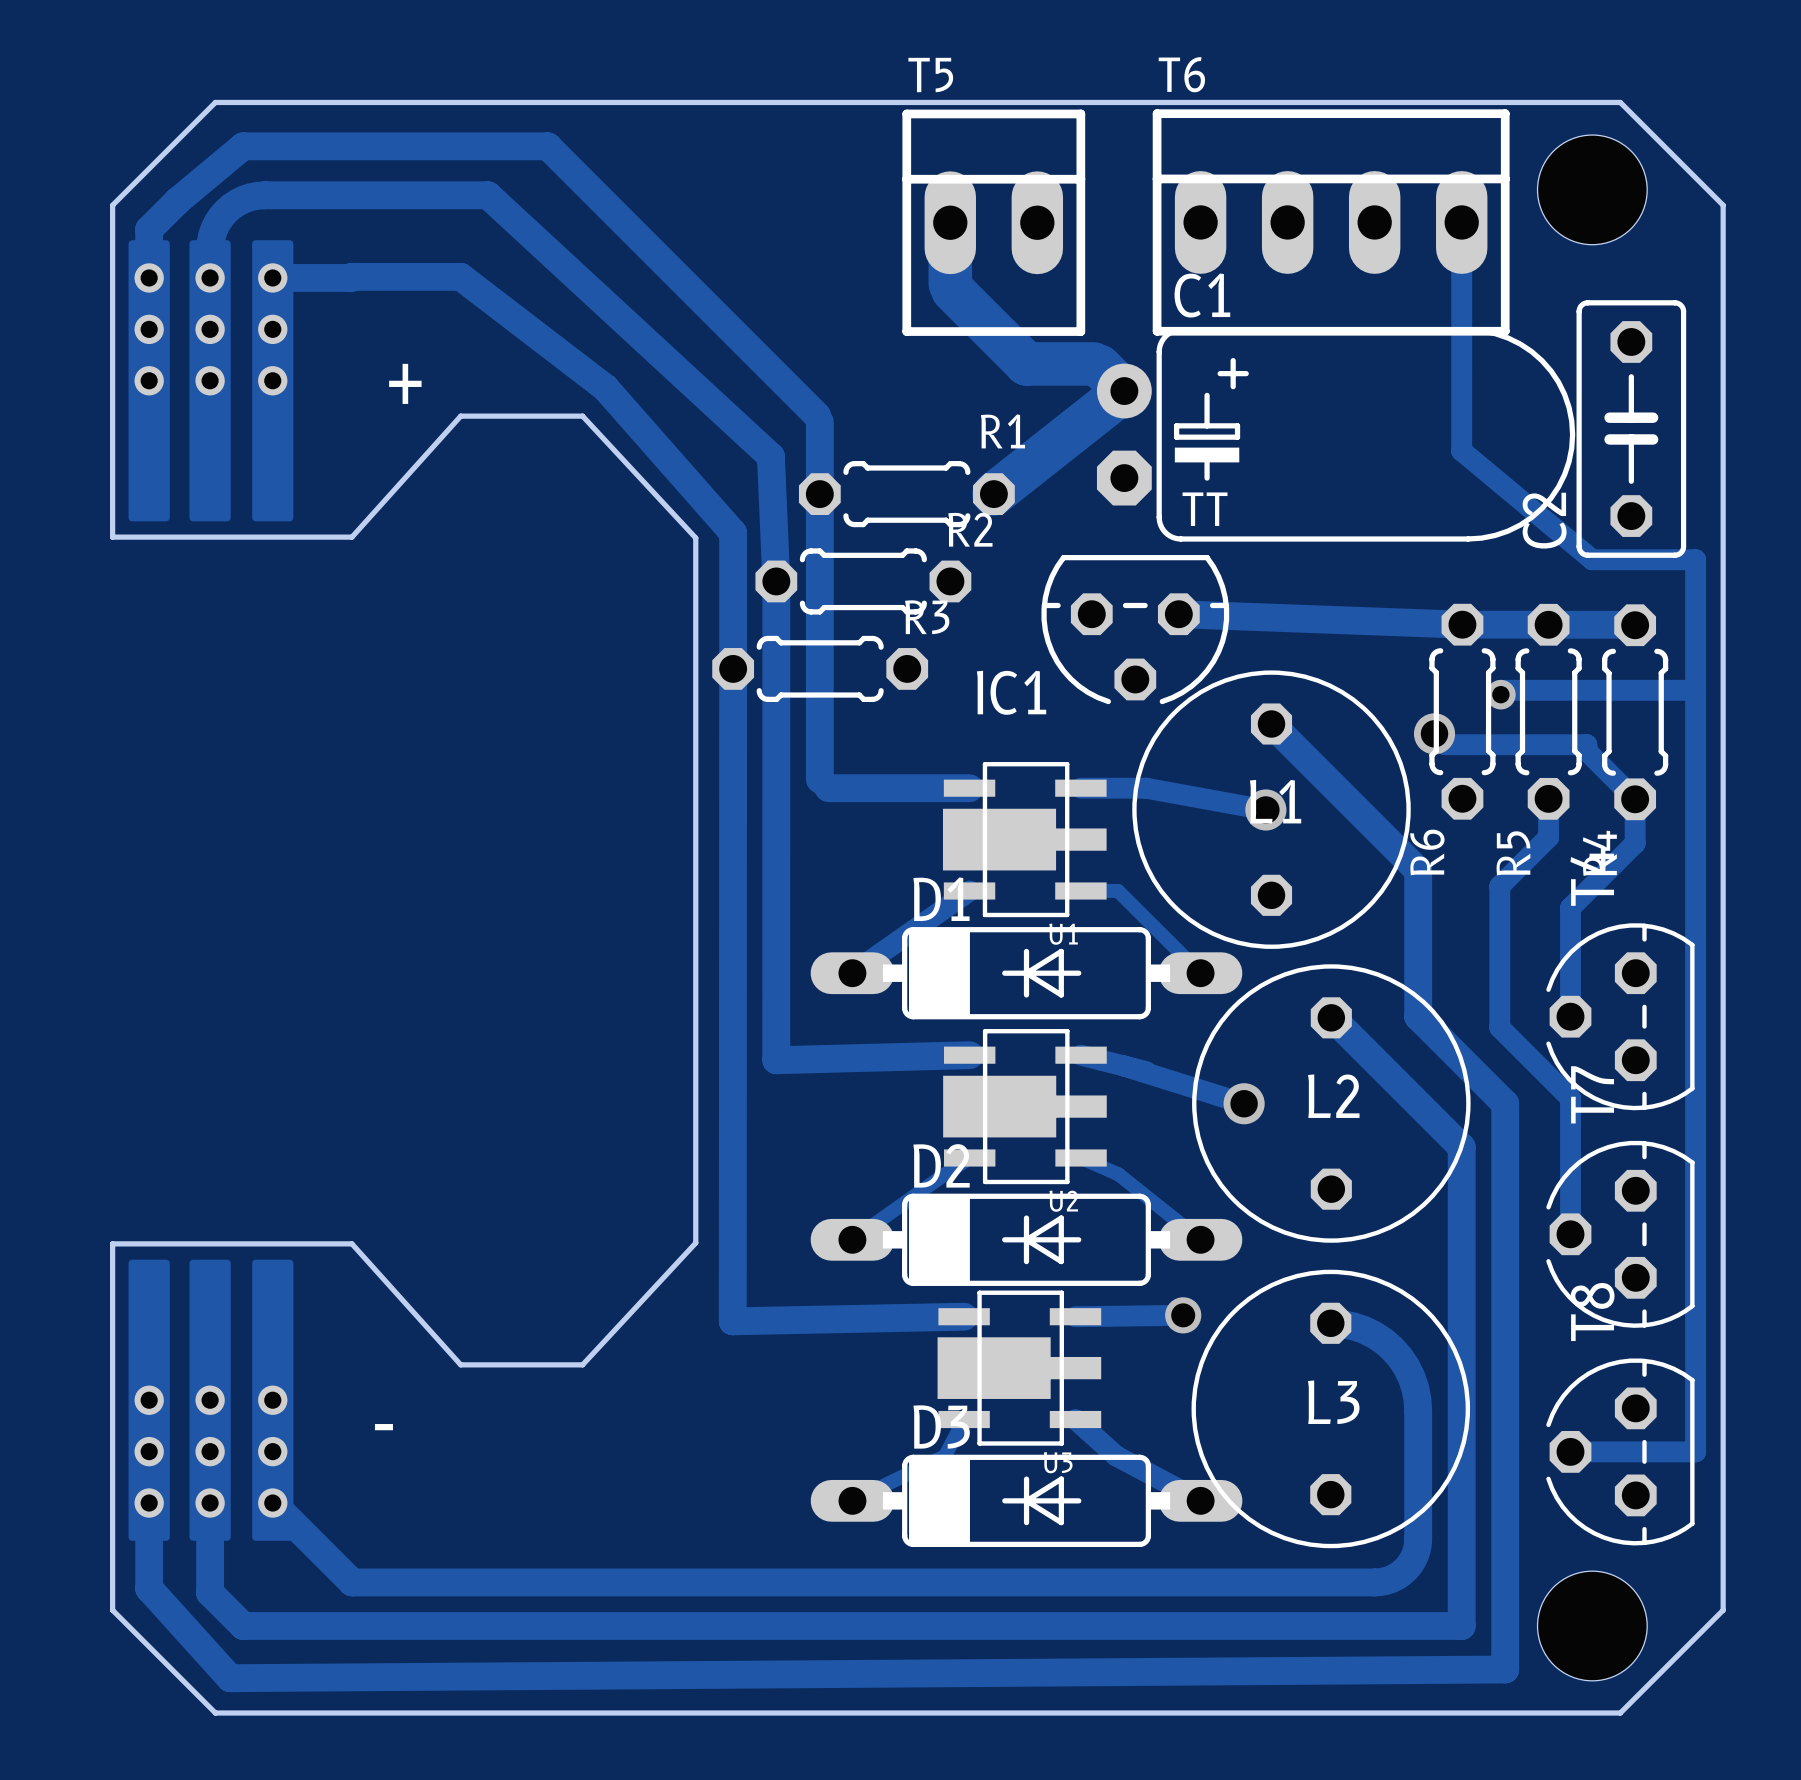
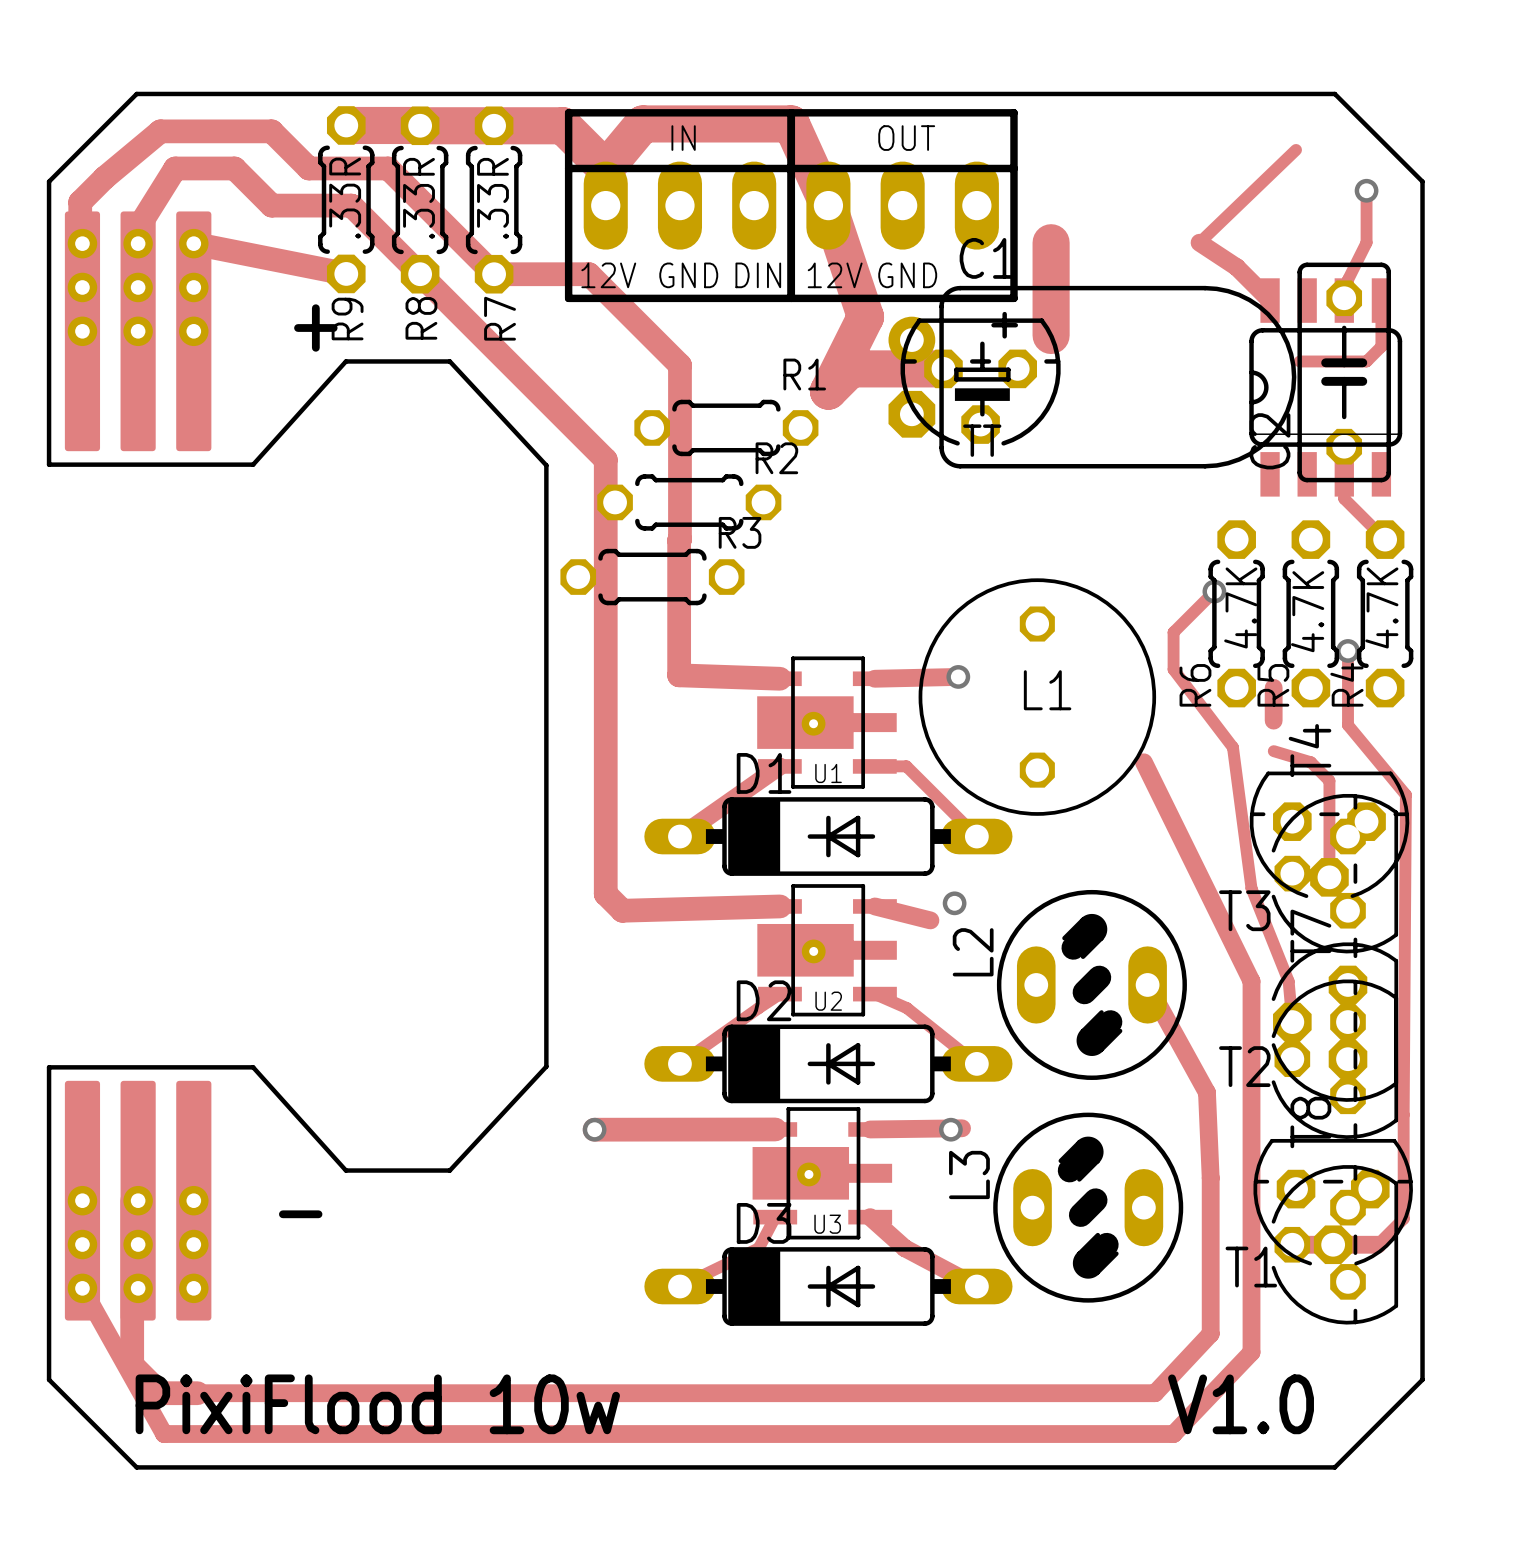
track: none -> (346, 125) (419, 125)
track: none -> (420, 125) (563, 125) (605, 168)
track: (373, 146) (547, 146) (817, 415) (819, 421) (820, 782) (828, 788) (969, 788) -> (271, 131) (308, 168) (388, 168) (494, 274) (589, 274) (679, 365) (679, 675) (779, 678)
text: none -> IN (683, 138)
text: none -> OUT (906, 138)
track: none -> (1296, 149) (1199, 242) (1236, 267) (1270, 300)
track: none -> (605, 168) (642, 123) (791, 123) (828, 205) (865, 316) (828, 391) (850, 368) (943, 368)
track: none -> (1366, 190) (1366, 242) (1348, 279) (1348, 296) (1344, 300)
via: none -> (1366, 190)
track: (950, 222) (951, 288) (1026, 363) (1095, 364) (1124, 391) (993, 494) -> none
T5: (993, 222) -> none
T6: (1331, 222) -> none
track: (1461, 222) (1461, 450) (1592, 559) (1695, 559) (1695, 1451) (1670, 1451) -> (1348, 650) (1348, 725) (1405, 794) (1403, 1218) (1377, 1244)
R9: none -> .33R (346, 199)
R8: none -> .33R (420, 199)
R7: none -> .33R (494, 200)
part: none -> (679, 205)
part: none -> (902, 205)
track: none -> (1051, 242) (1051, 335)
track: none -> (346, 273) (193, 243) (193, 331)
text: none -> 12V (608, 275)
text: none -> GND (688, 275)
text: none -> DIN (758, 275)
text: none -> 12V (835, 275)
text: none -> GND (907, 275)
track: none -> (1381, 300) (1381, 346) (1366, 361) (1299, 361)
text: none -> + (315, 328)
part: none -> (82, 331)
track: (210, 380) (210, 242) (217, 222) (226, 211) (237, 202) (250, 197) (264, 195) (487, 195) (770, 456) (776, 581) (776, 1060) (969, 1055) -> (138, 331) (138, 227) (175, 168) (234, 168) (271, 205) (351, 205) (605, 459) (605, 894) (622, 910) (779, 906)
part: none -> (138, 331)
track: (272, 380) (272, 277) (460, 276) (605, 387) (733, 532) (732, 1321) (964, 1316) -> (594, 1129) (775, 1129)
part: none -> (193, 331)
part: none -> (980, 382)
part: none -> (1325, 387)
track: none -> (1344, 474) (1344, 498) (1385, 539)
R6 footprint: [1429, 603, 1496, 820] -> [1208, 520, 1265, 708]
R5 footprint: [1515, 603, 1582, 820] -> [1282, 520, 1340, 708]
R4 footprint: [1602, 604, 1669, 821] -> [1356, 520, 1414, 708]
track: (1178, 614) (1462, 624) (1634, 624) -> none
IC1: (1135, 629) -> none
track: none -> (1214, 591) (1173, 632) (1173, 669) (1232, 747) (1251, 888) (1288, 981) (1292, 1022)
track: (1695, 690) (1505, 690) (1500, 694) -> none
via position: (1500, 694) -> (1214, 591)
R6 value: none -> 4.7K (1240, 607)
R4 value: none -> 4.7K (1381, 607)
R5 value: none -> 4.7K (1307, 611)
track: (1271, 724) (1418, 870) (1418, 1016) (1505, 1103) (1505, 1669) (230, 1678) (149, 1588) (149, 1503) -> none
track: (1434, 733) (1445, 744) (1586, 744) (1586, 750) (1635, 799) (1635, 843) (1570, 907) (1570, 1016) -> none
via: (1434, 733) -> none
via: none -> (1348, 650)
U1 footprint: [942, 762, 1107, 918] -> [757, 656, 897, 789]
via: none -> (958, 676)
track: (1080, 788) (1146, 788) (1265, 809) -> (874, 678) (958, 676)
via: (1265, 809) -> none
track: (1548, 837) (1499, 886) (1499, 1027) (1570, 1098) (1570, 1234) -> none
track: none -> (1273, 751) (1310, 762) (1329, 780) (1329, 877)
track: none -> (1143, 762) (1251, 981) (1251, 1352) (1173, 1434) (164, 1434) (82, 1288) (82, 1200)
part: (917, 907) -> none
L2 footprint: [1192, 964, 1471, 1243] -> [996, 889, 1187, 1080]
T3: none -> (1329, 834)
track: (1331, 1017) (1461, 1147) (1461, 1625) (1409, 1625) -> (1147, 984) (1206, 1092) (1210, 1177) (1210, 1333) (1155, 1393)
U2 footprint: [943, 1029, 1107, 1185] -> [757, 884, 897, 1017]
via: none -> (954, 903)
track: (1123, 1065) (1244, 1103) -> none
L2 name position: L2 (1333, 1096) -> L2 (973, 952)
via: (1244, 1103) -> none
T2: none -> (1334, 1022)
L3 footprint: [1191, 1269, 1471, 1549] -> [993, 1112, 1184, 1303]
U3 footprint: [937, 1290, 1102, 1446] -> [752, 1107, 893, 1240]
via size: [1165, 1297, 1202, 1334] -> [939, 1117, 963, 1142]
via: none -> (594, 1129)
track: (1330, 1323) (1353, 1326) (1383, 1341) (1400, 1357) (1415, 1388) (1418, 1410) (1417, 1544) (1414, 1555) (1405, 1569) (1385, 1580) (352, 1582) (272, 1503) (272, 1400) -> none
part: none -> (82, 1200)
part: none -> (138, 1200)
part: none -> (193, 1200)
T1: none -> (1333, 1202)
L3 name position: L3 (1333, 1402) -> L3 (969, 1174)
text: none -> - (300, 1214)
track width: thick (286, 1625) (1409, 1625) -> thin (197, 1393) (1155, 1393)
text: none -> PixiFlood 10w (377, 1404)
text: none -> V1.0 (1241, 1404)

